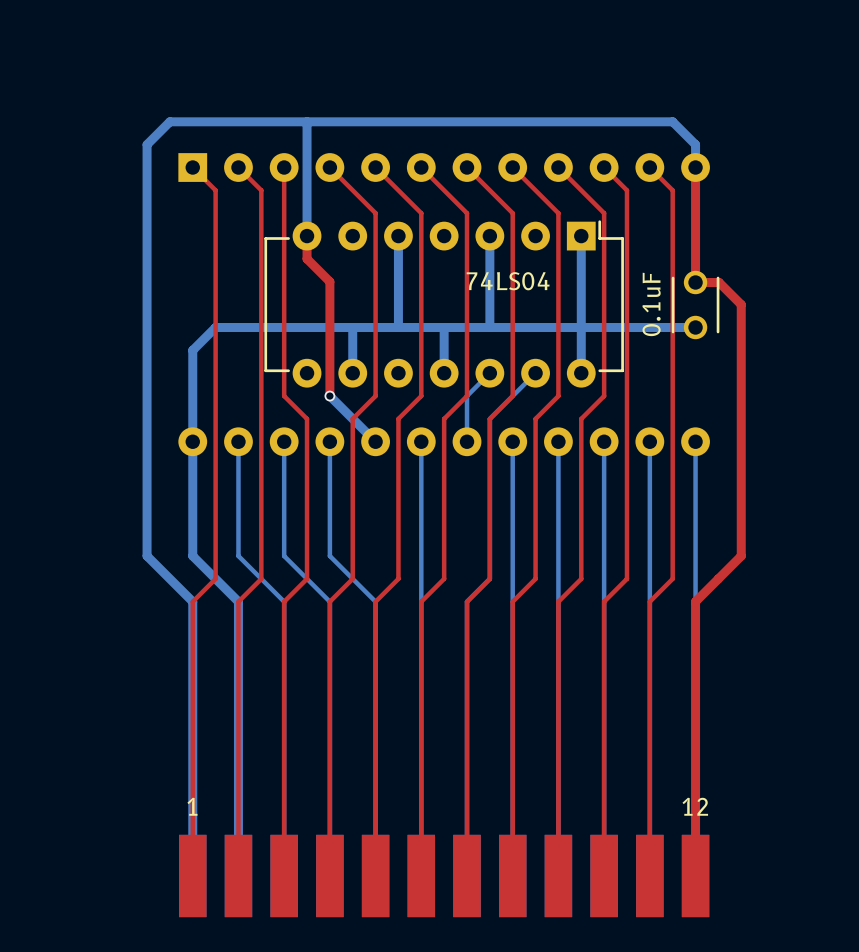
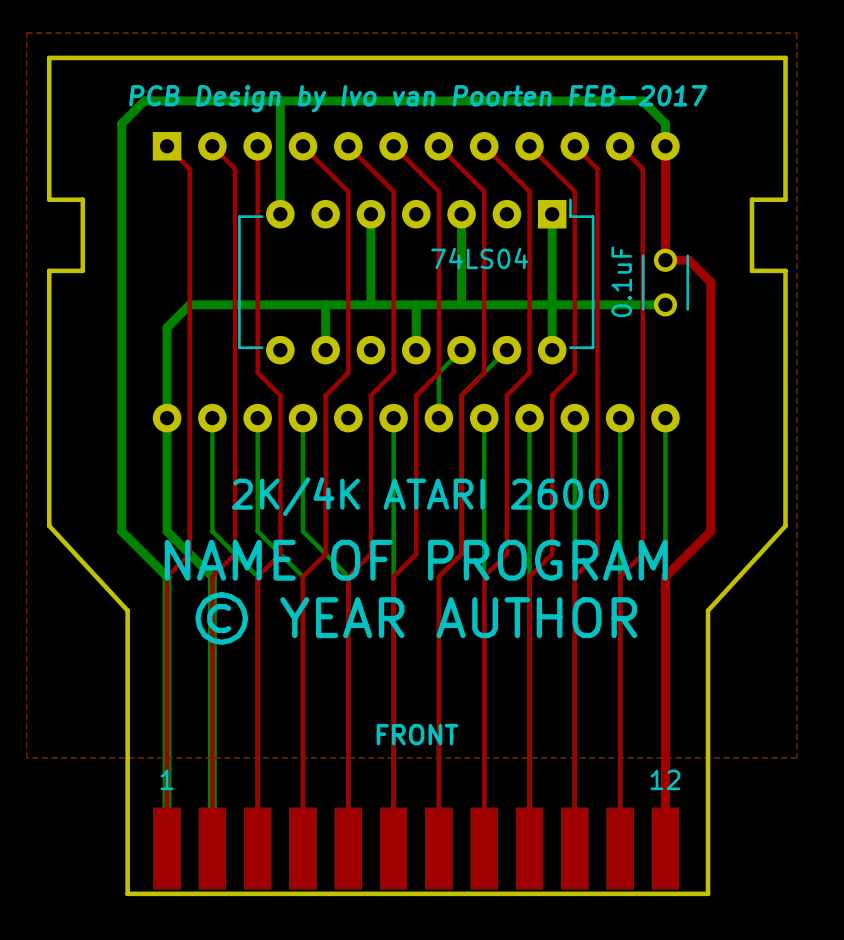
top zone outline: none -> (26, 33) (26, 757) (796, 757) (796, 33) (26, 33)
board edge: none -> (49, 57) (785, 57) (785, 199) (751, 199) (751, 270) (785, 270) (785, 525) (708, 610) (708, 893) (127, 893) (127, 610) (49, 525) (49, 270) (82, 270) (82, 199) (49, 199) (49, 57)
text: none -> PCB Design by Ivo van Poorten FEB-2017 (418, 98)
top track: (307, 236) (307, 258) (329, 281) (329, 396) -> none
bottom track: (329, 396) (375, 441) -> none
via: (329, 396) -> none
text: none -> 2K/4K ATARI 2600 (420, 496)
text: none -> NAME OF PROGRAM (416, 560)
text: none -> © YEAR AUTHOR (416, 618)
text: none -> FRONT (417, 734)

